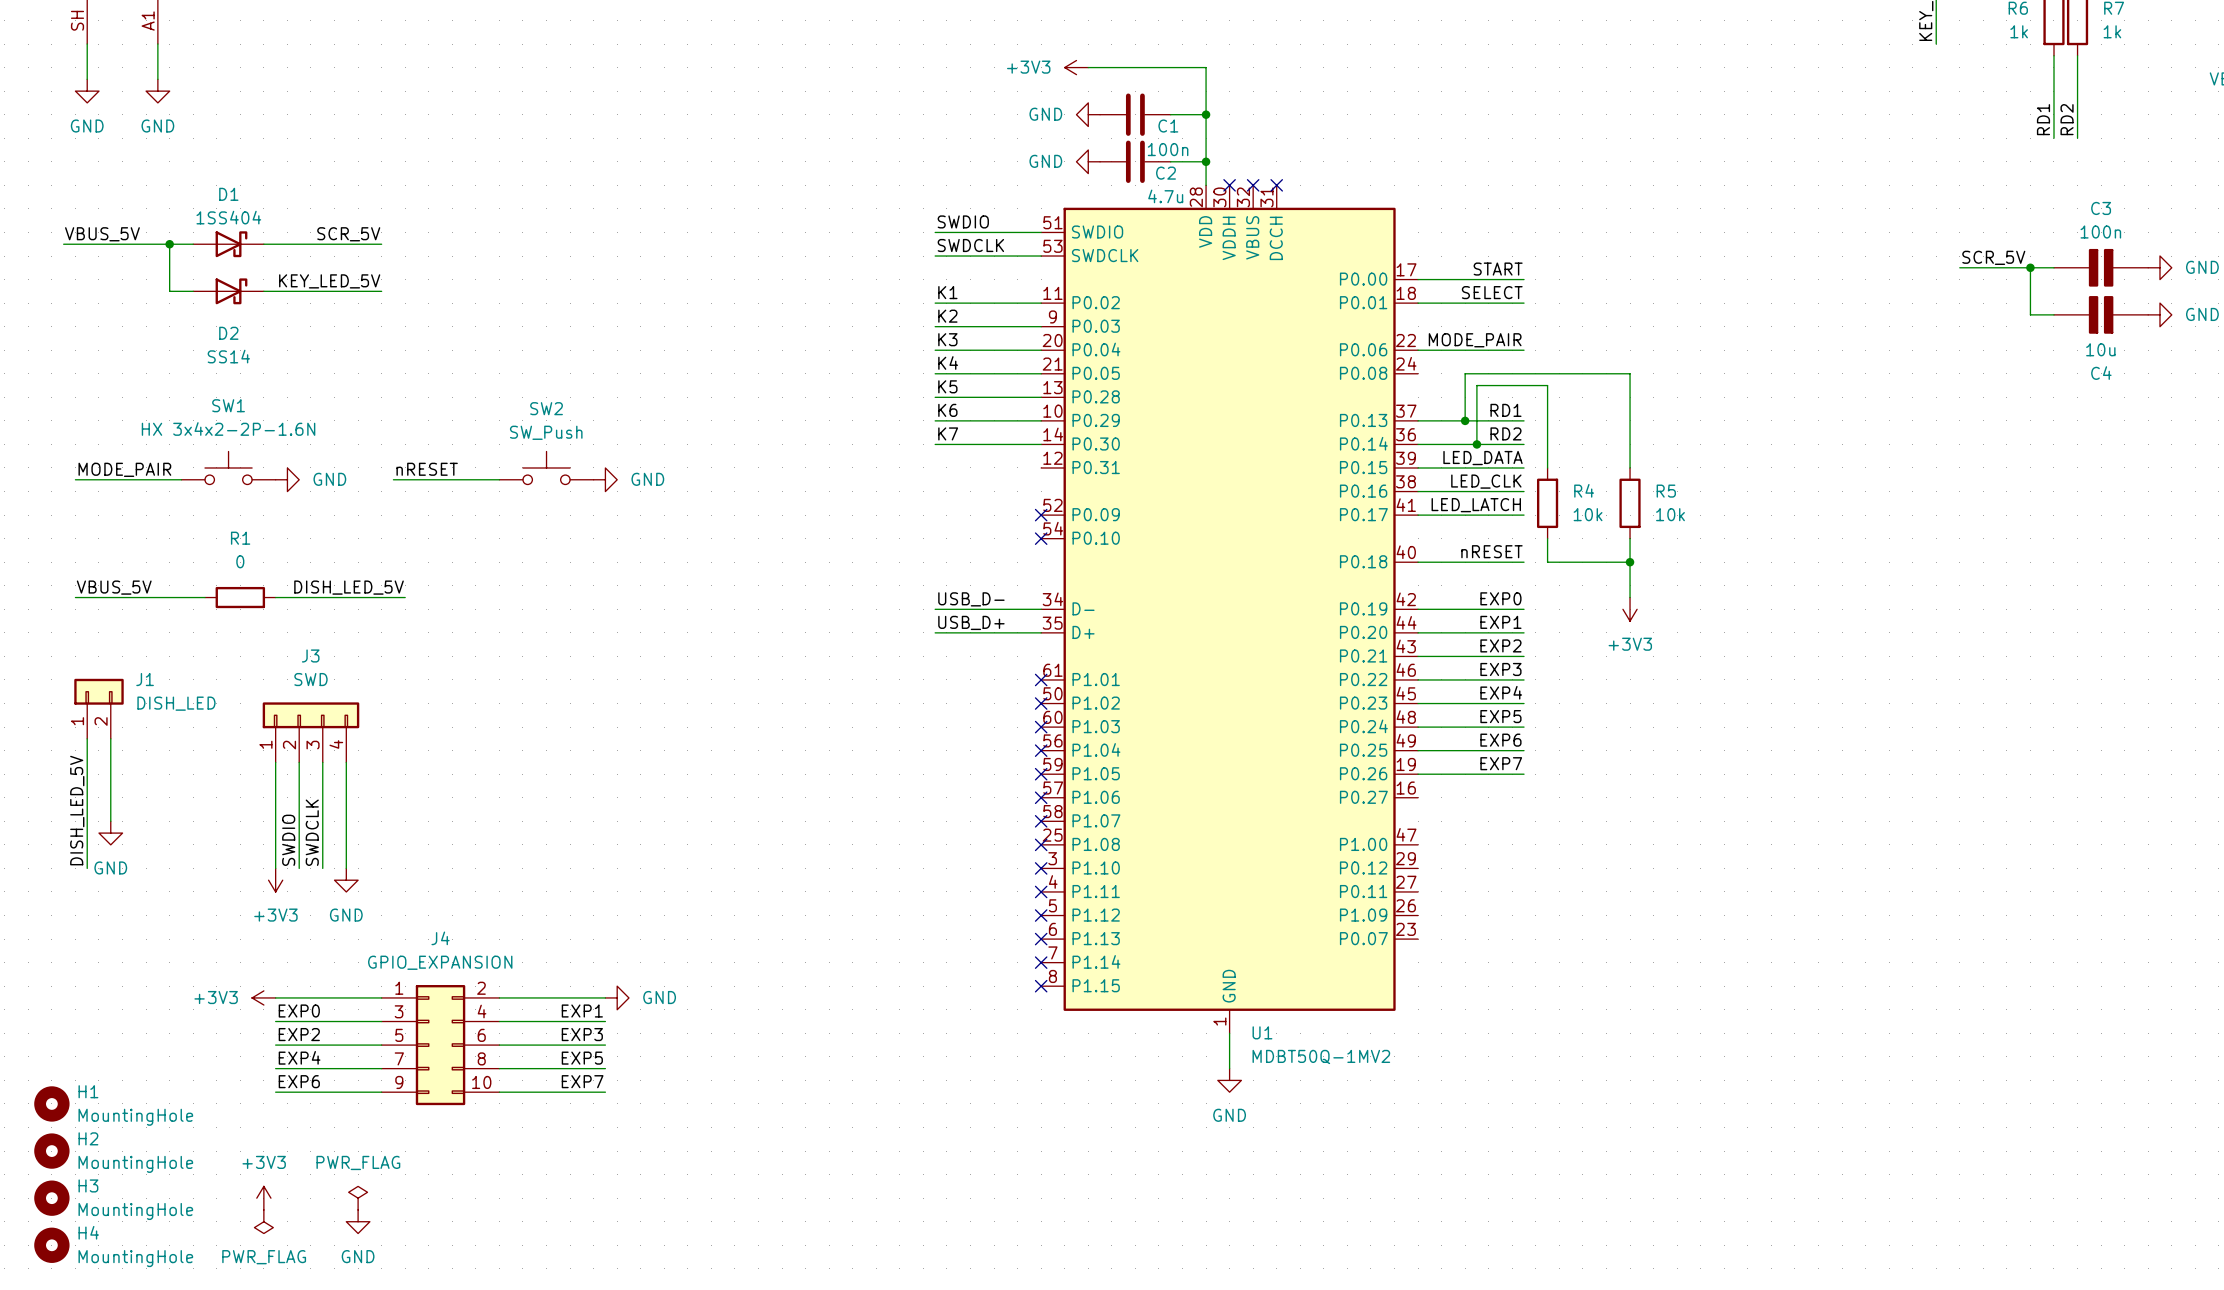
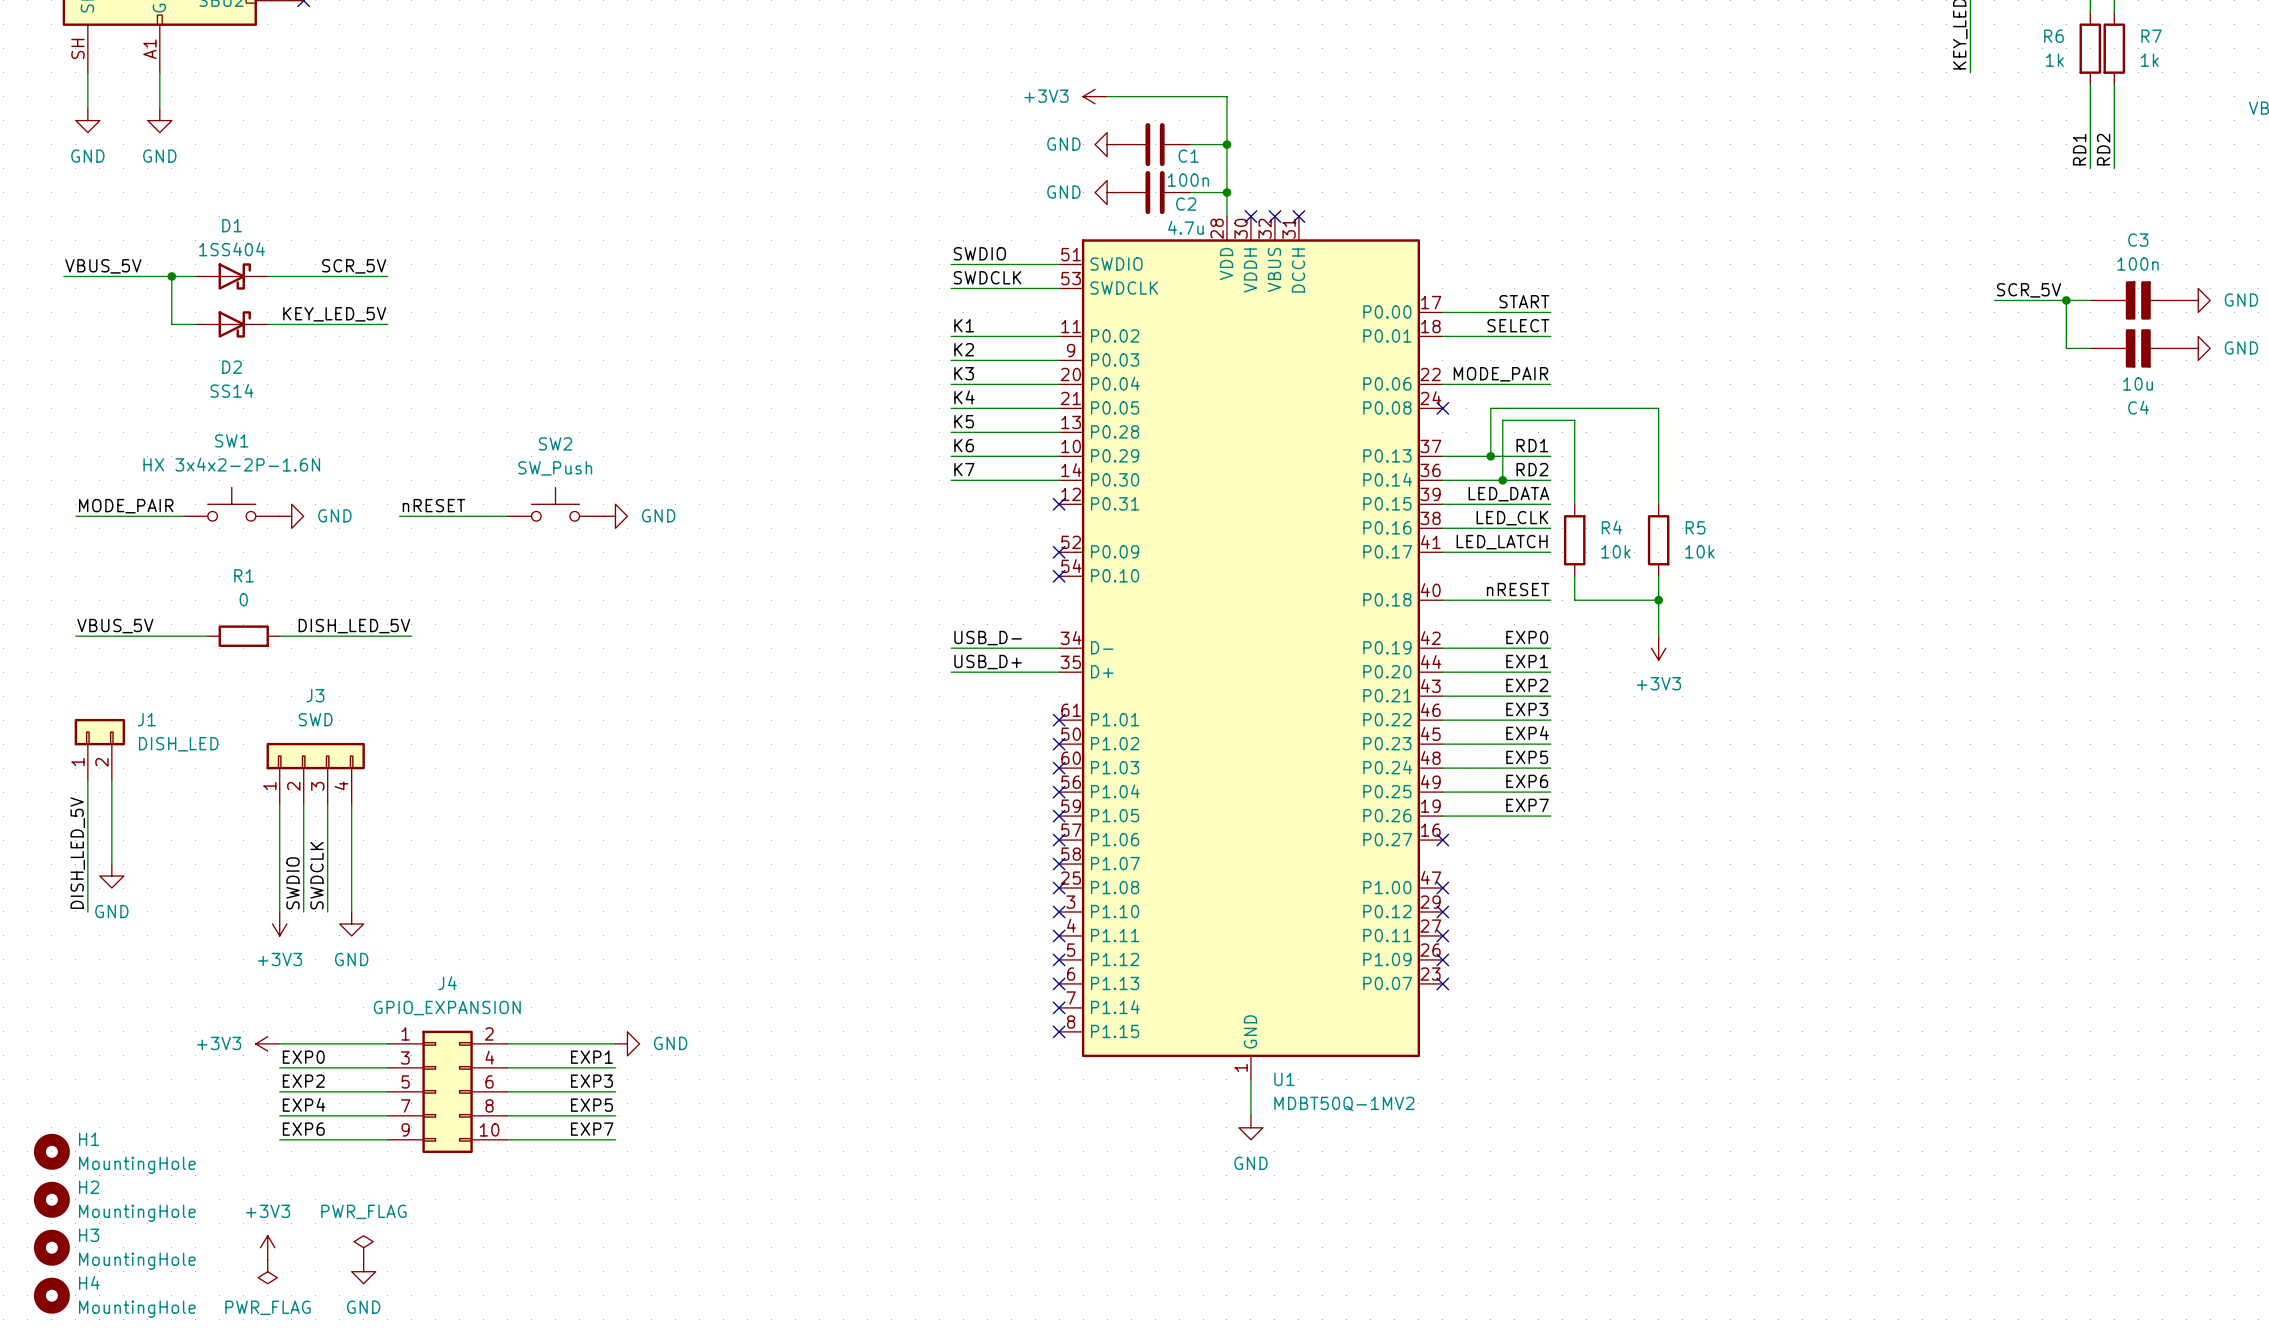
no-connect mark: none -> (1442, 408)
no-connect mark: none -> (1059, 504)
no-connect mark: none -> (1442, 840)
no-connect mark: none -> (1442, 888)
no-connect mark: none -> (1442, 911)
no-connect mark: none -> (1442, 935)
no-connect mark: none -> (1442, 959)
no-connect mark: none -> (1442, 983)

